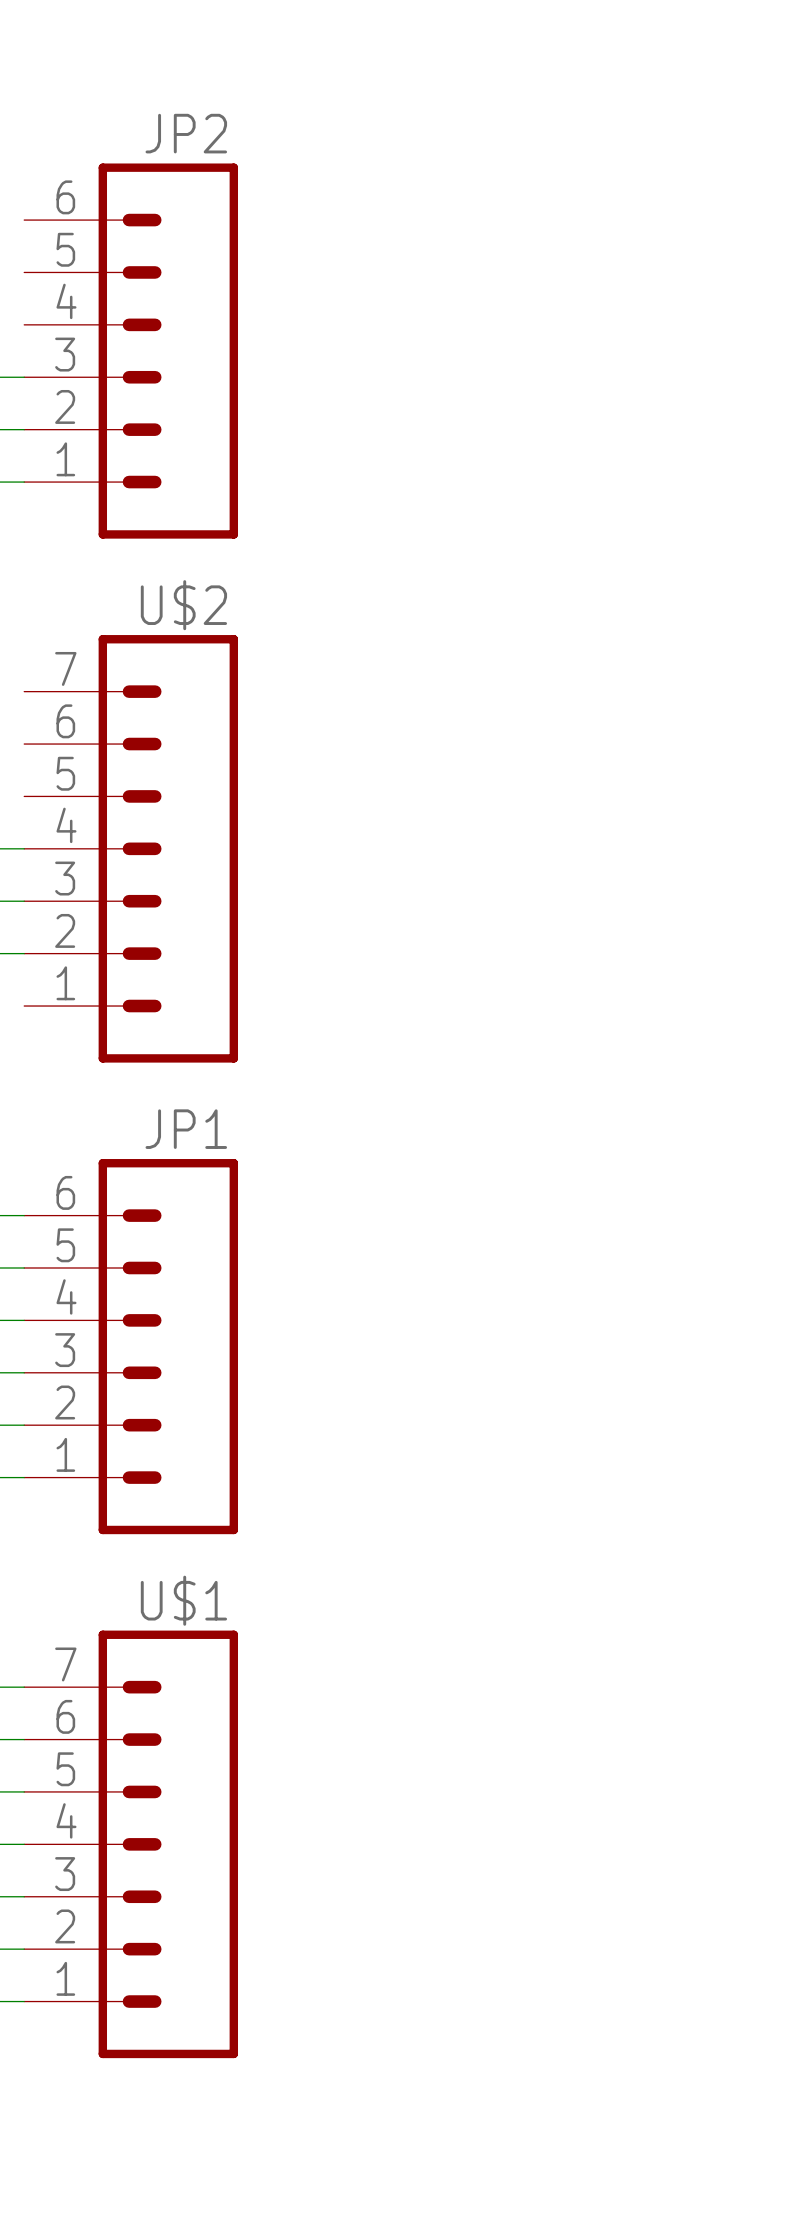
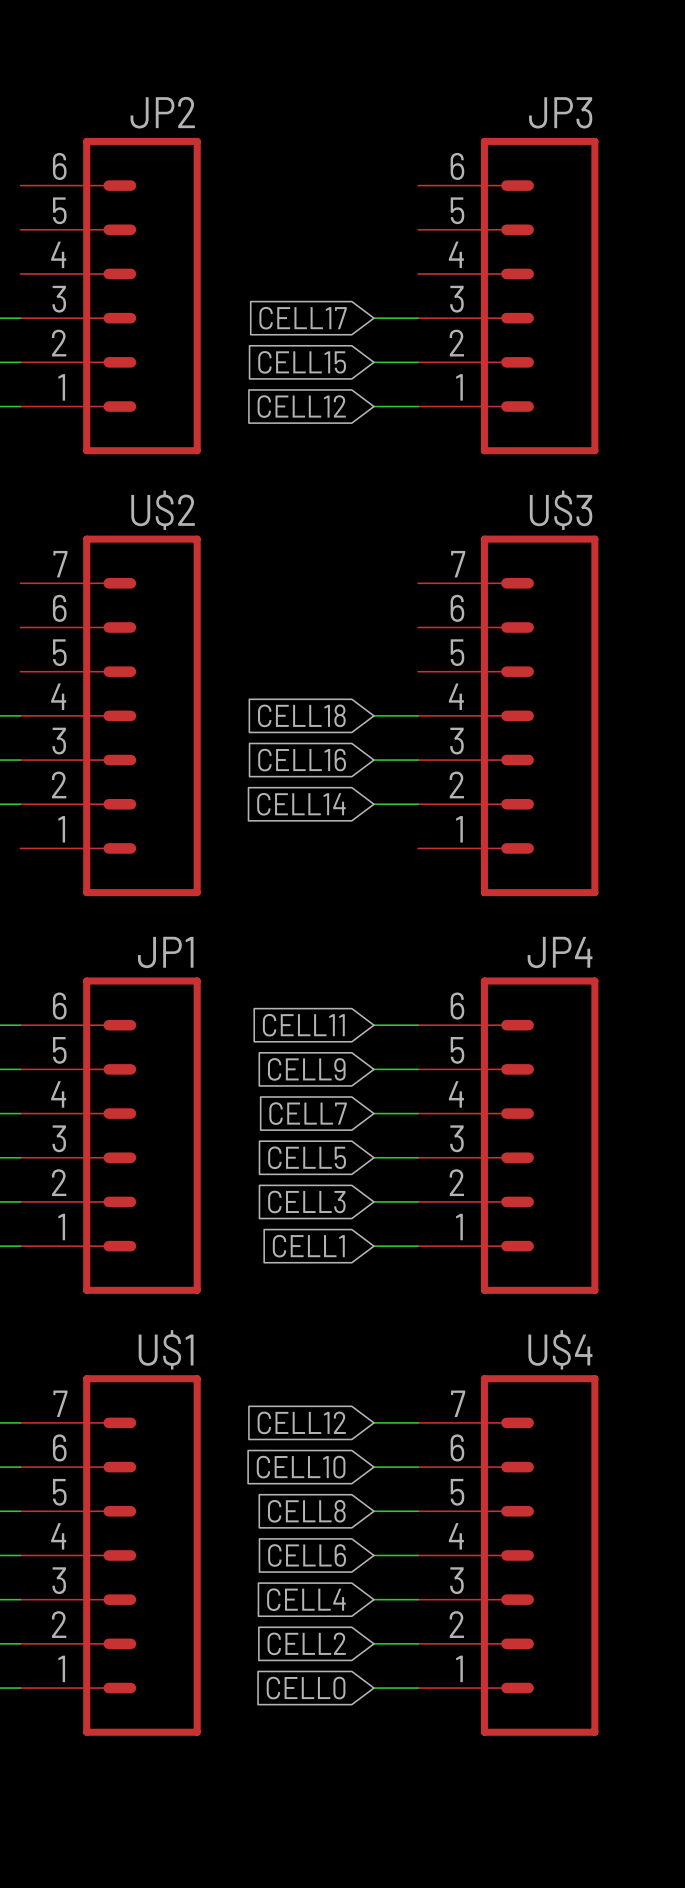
JP3: none -> (508, 296)
global label: none -> CELL17 (303, 318)
wire: none -> (373, 318) (418, 318)
global label: none -> CELL15 (302, 362)
wire: none -> (373, 362) (418, 362)
global label: none -> CELL12 (301, 406)
wire: none -> (373, 406) (418, 406)
global label: none -> CELL18 (301, 715)
wire: none -> (373, 715) (418, 715)
U$3: none -> (508, 715)
global label: none -> CELL16 (302, 760)
wire: none -> (373, 760) (418, 760)
global label: none -> CELL14 (301, 804)
wire: none -> (373, 804) (418, 804)
global label: none -> CELL11 (303, 1025)
wire: none -> (373, 1025) (418, 1025)
global label: none -> CELL9 (306, 1069)
wire: none -> (373, 1069) (418, 1069)
global label: none -> CELL7 (308, 1113)
wire: none -> (373, 1113) (418, 1113)
JP4: none -> (508, 1135)
global label: none -> CELL5 (307, 1157)
wire: none -> (373, 1157) (418, 1157)
global label: none -> CELL3 (306, 1201)
wire: none -> (373, 1201) (418, 1201)
global label: none -> CELL1 (308, 1246)
wire: none -> (373, 1246) (418, 1246)
global label: none -> CELL12 (301, 1422)
wire: none -> (373, 1422) (418, 1422)
global label: none -> CELL10 (301, 1467)
wire: none -> (373, 1467) (418, 1467)
global label: none -> CELL8 (306, 1511)
wire: none -> (373, 1511) (418, 1511)
global label: none -> CELL6 (307, 1555)
wire: none -> (373, 1555) (418, 1555)
U$4: none -> (508, 1555)
global label: none -> CELL4 (306, 1599)
wire: none -> (373, 1599) (418, 1599)
global label: none -> CELL2 (306, 1643)
wire: none -> (373, 1643) (418, 1643)
global label: none -> CELL0 (306, 1688)
wire: none -> (373, 1688) (418, 1688)

